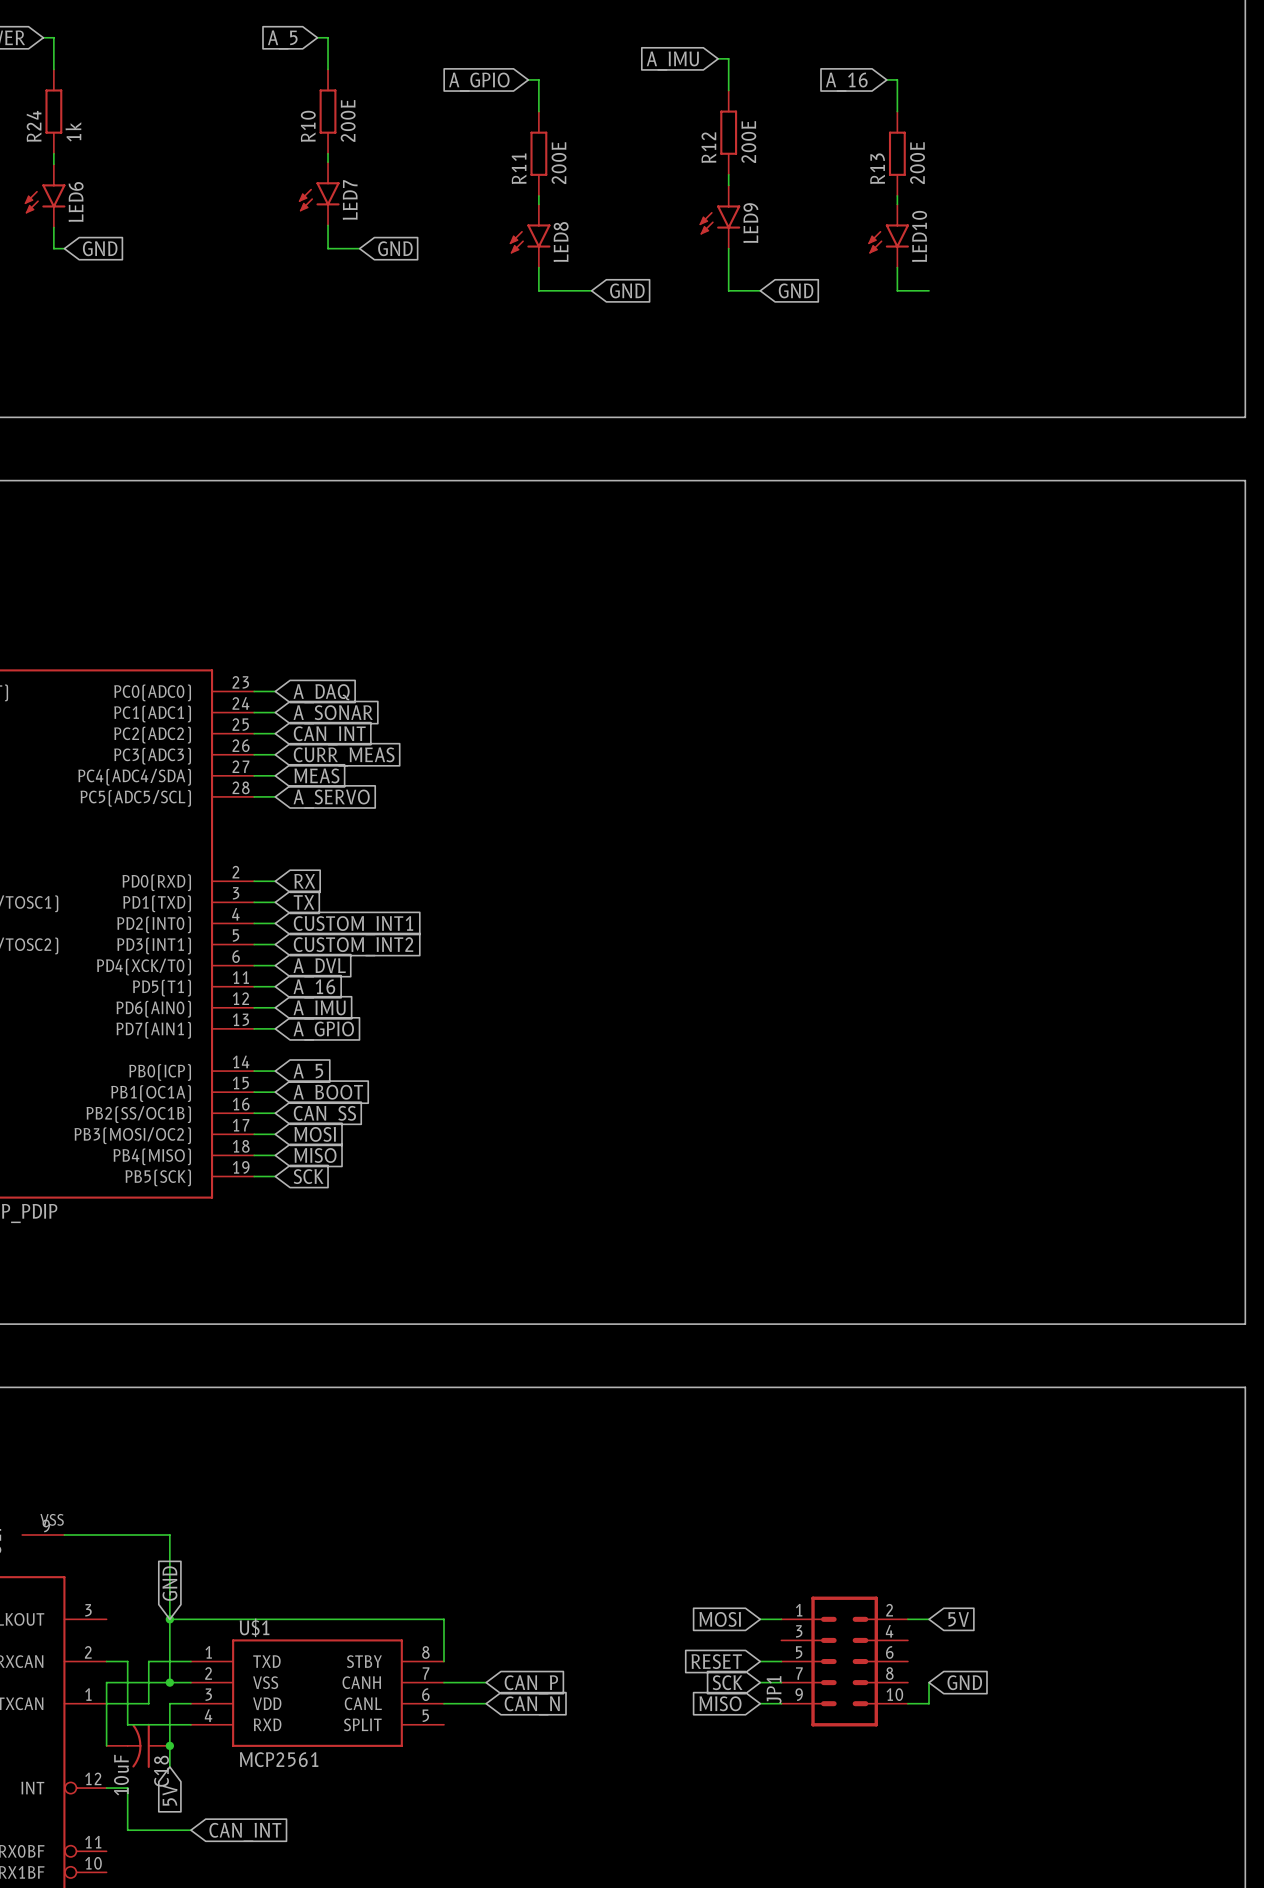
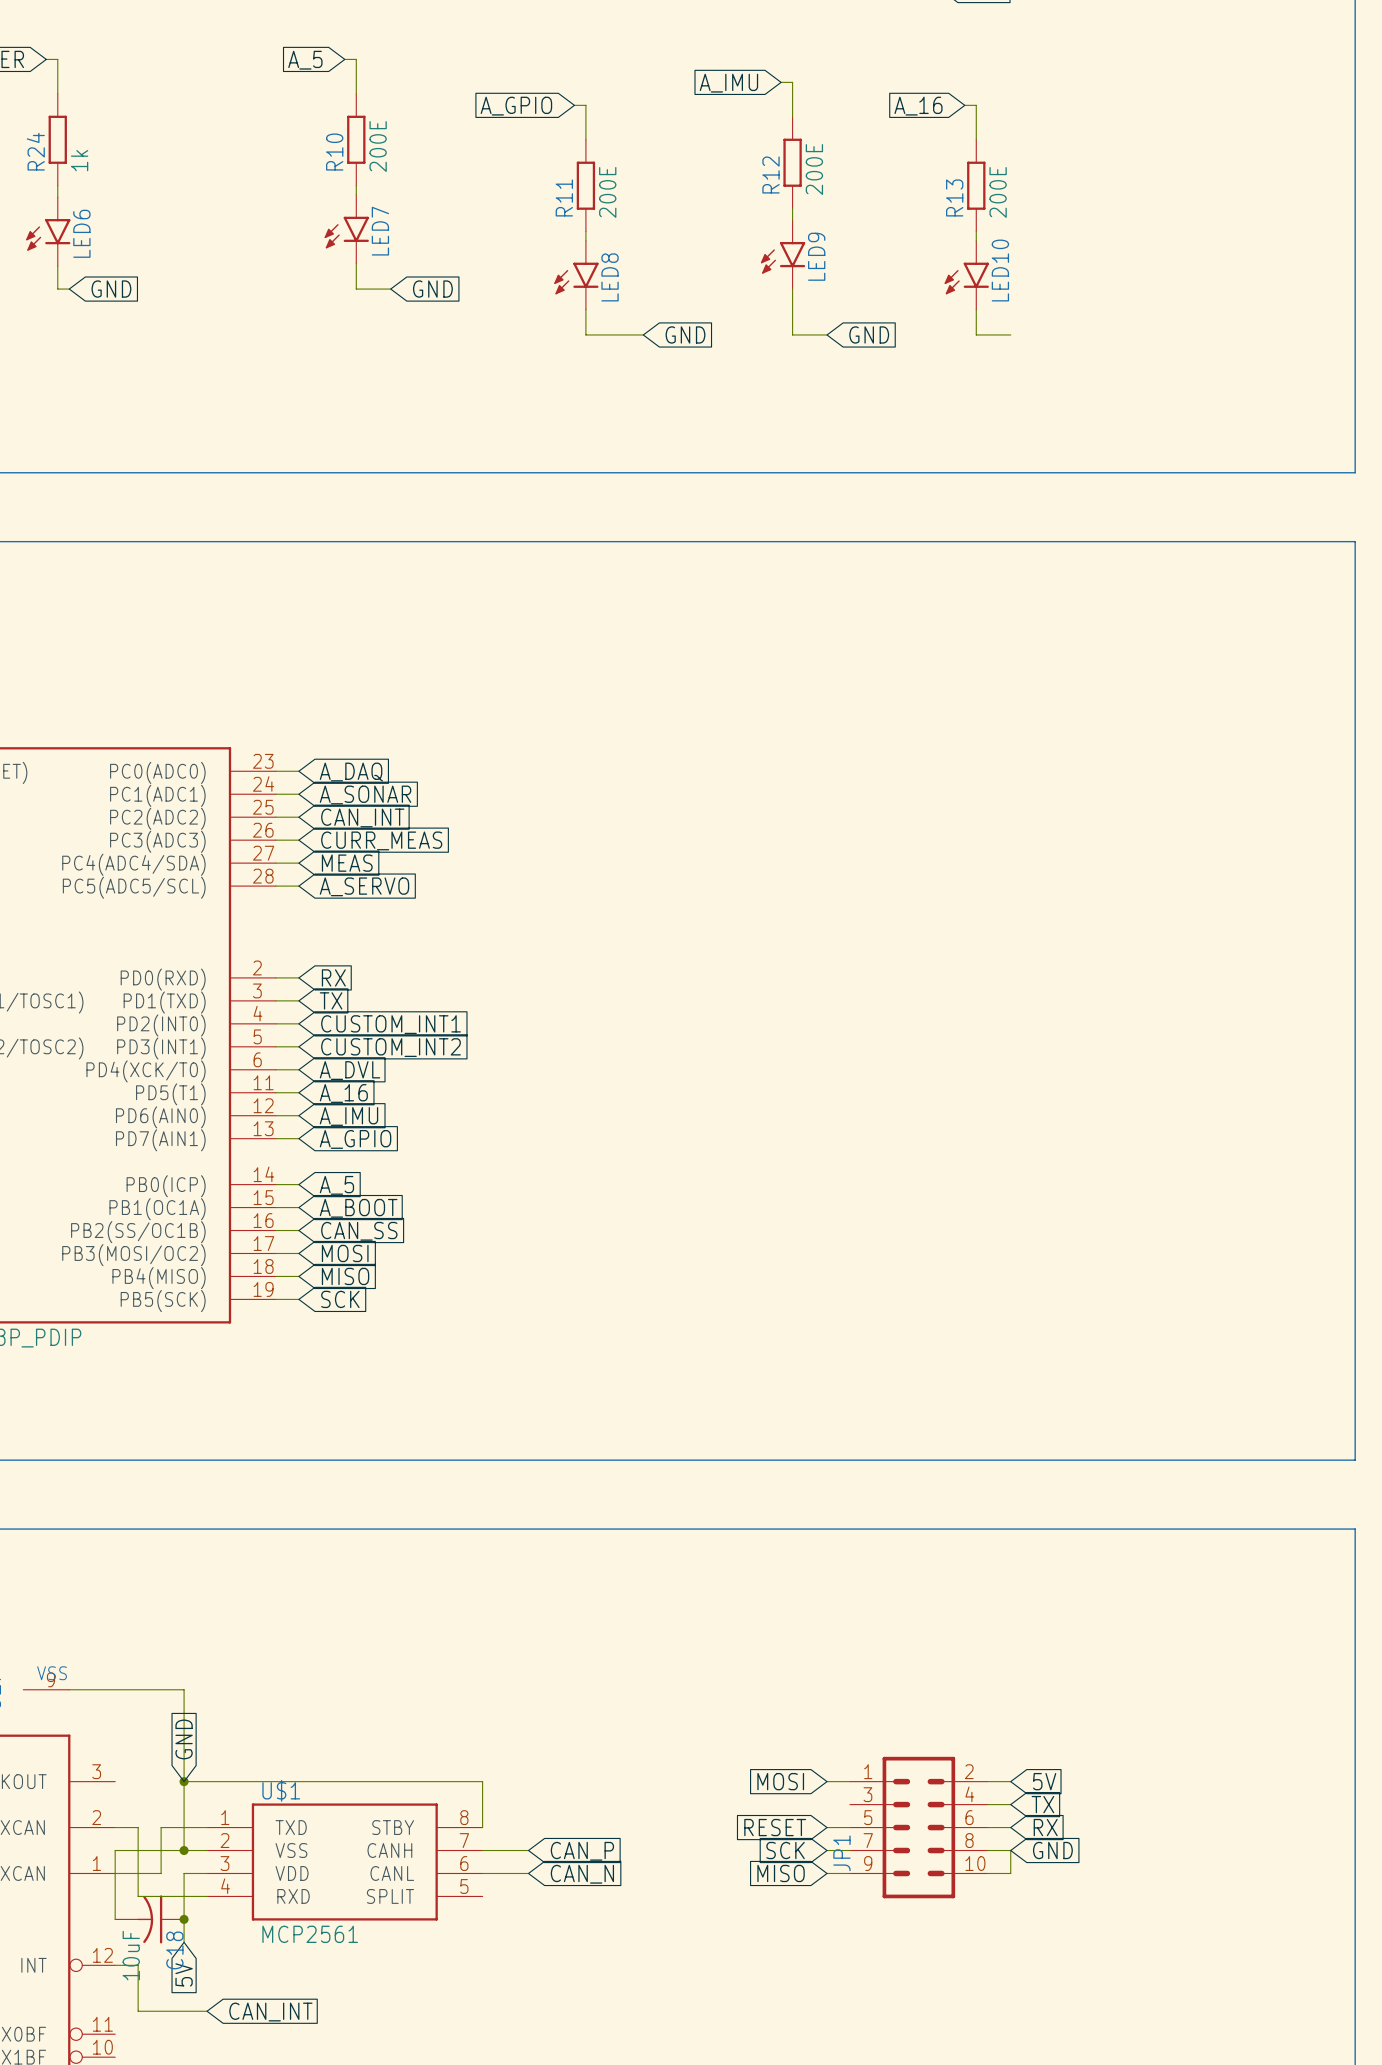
wire: none -> (987, 1804) (1010, 1804)
global label: none -> TX (1042, 1804)
wire: none -> (987, 1827) (1010, 1827)
global label: none -> RX (1045, 1827)
wire: none -> (987, 1850) (1010, 1850)

